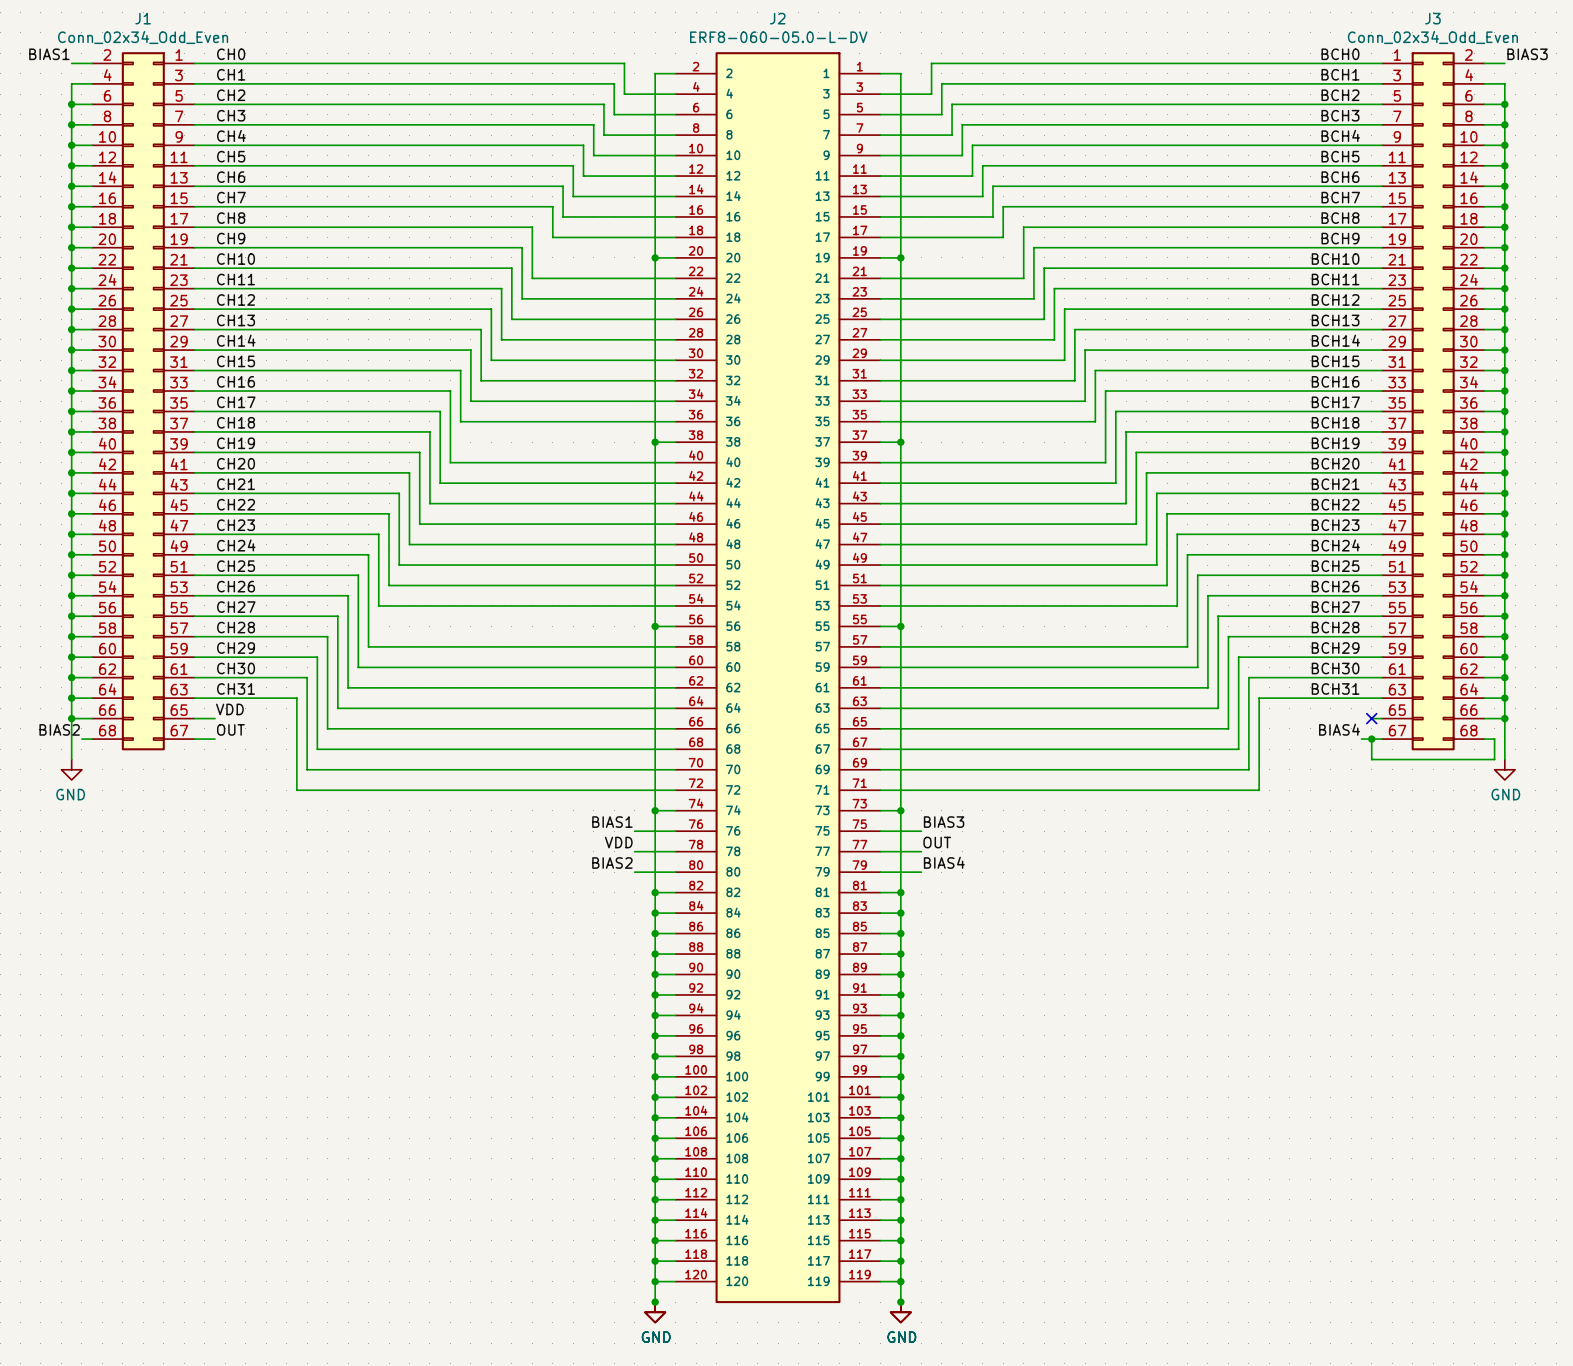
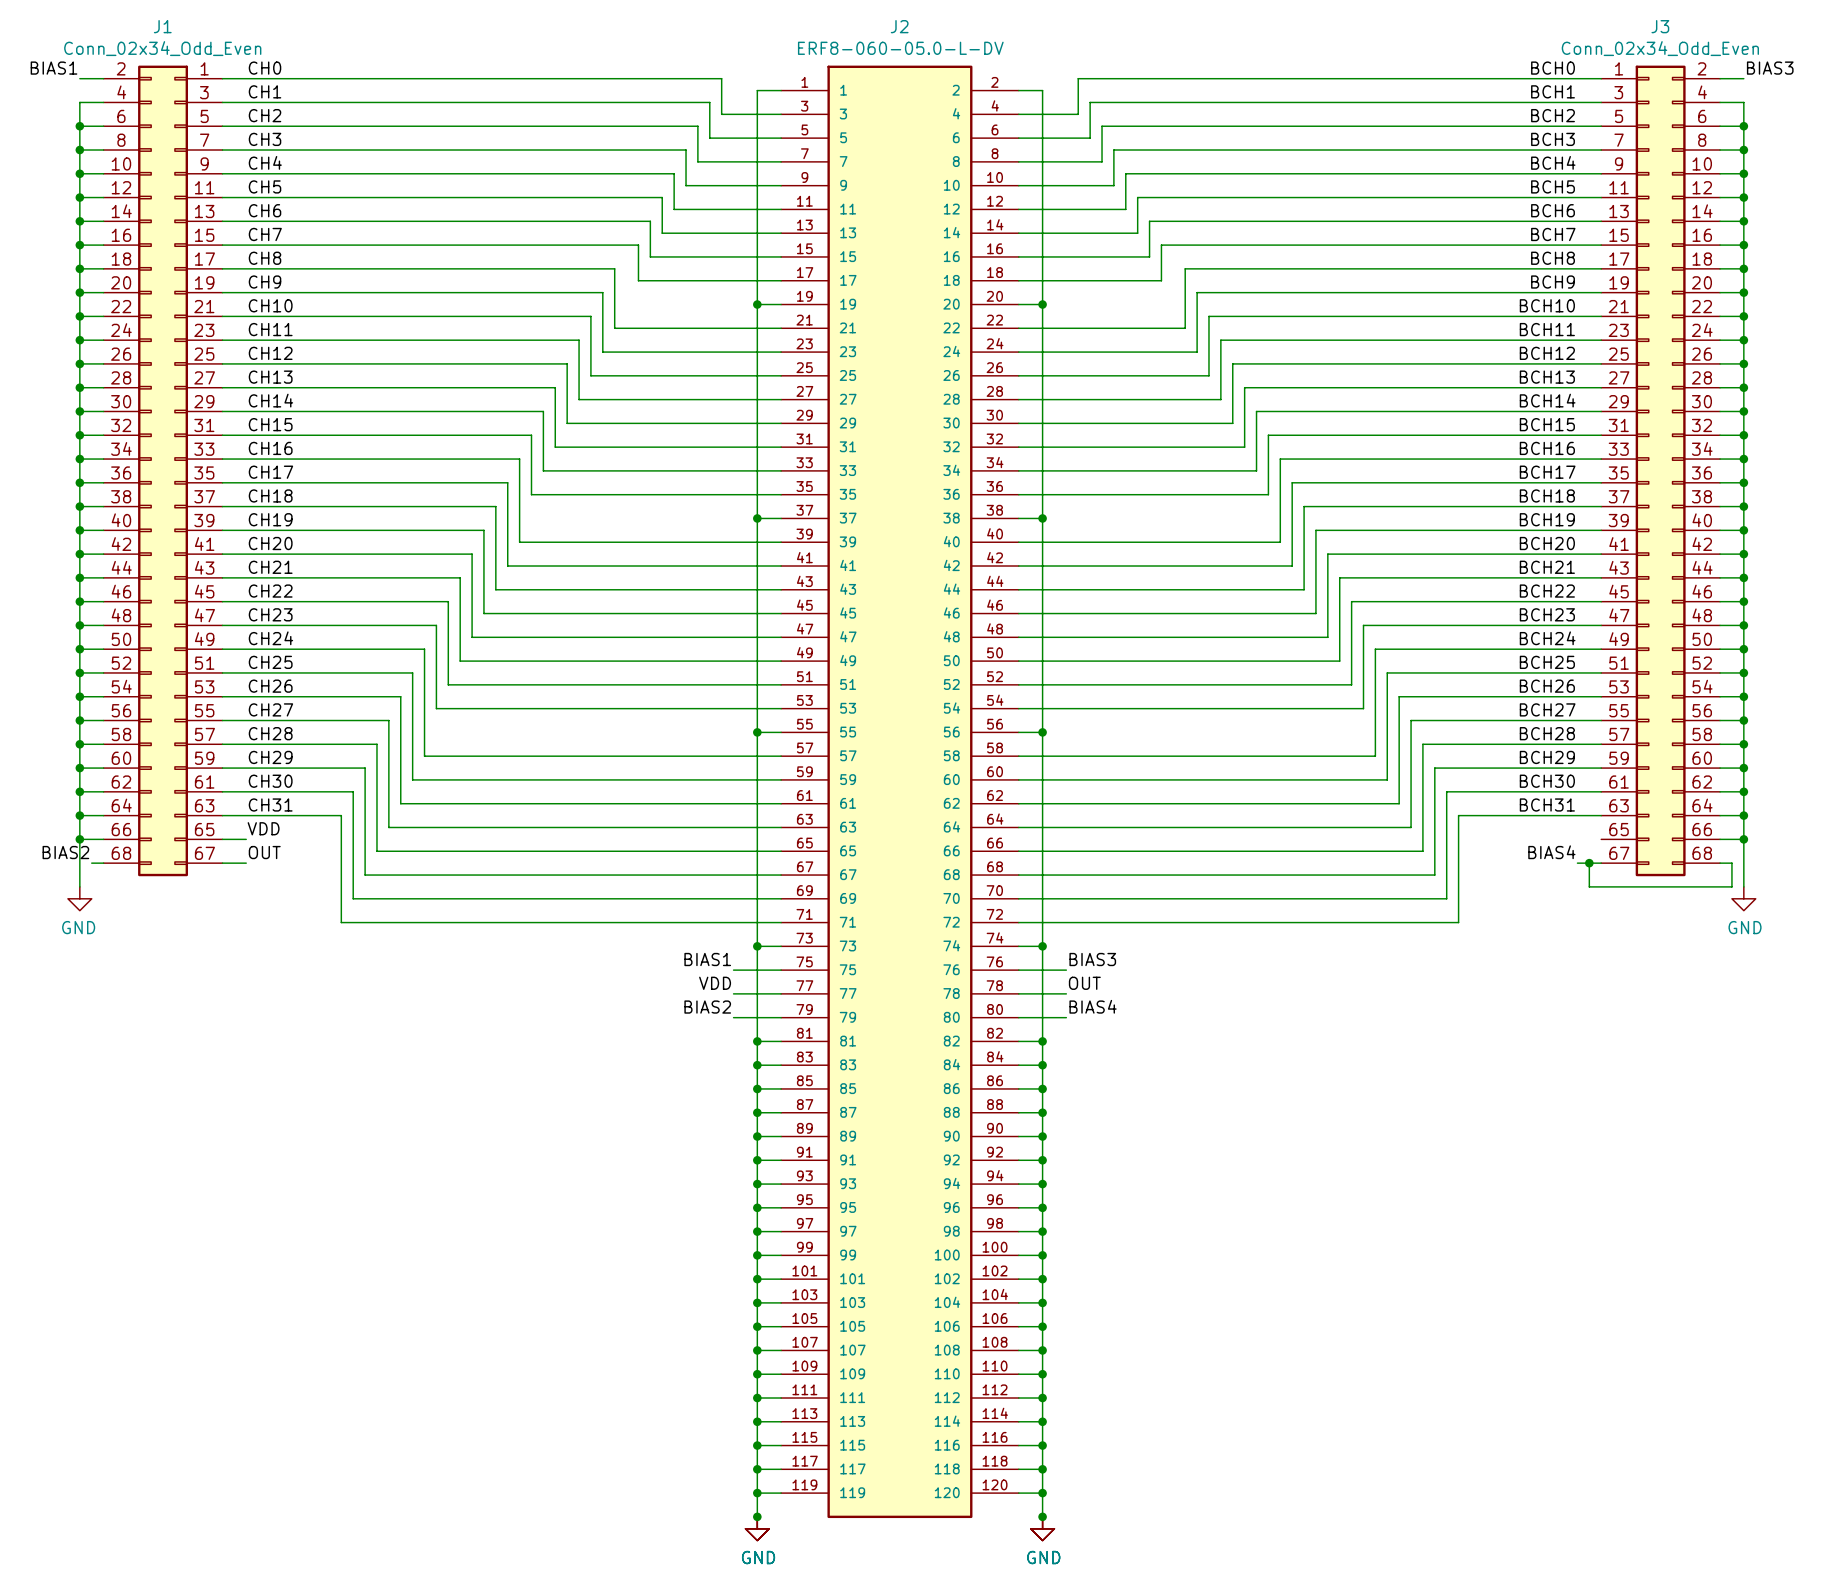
J2 flip: as is (778, 677) -> left-right (899, 791)
wire: (1371, 718) (1381, 718) -> none
no-connect mark: (1371, 718) -> none

